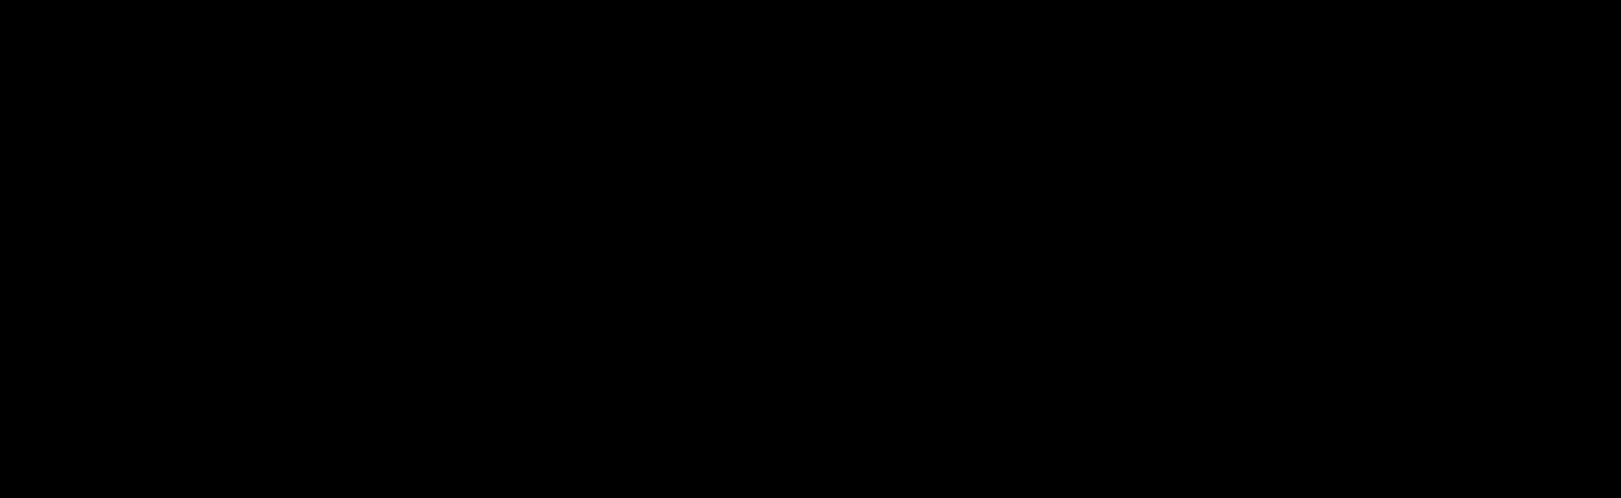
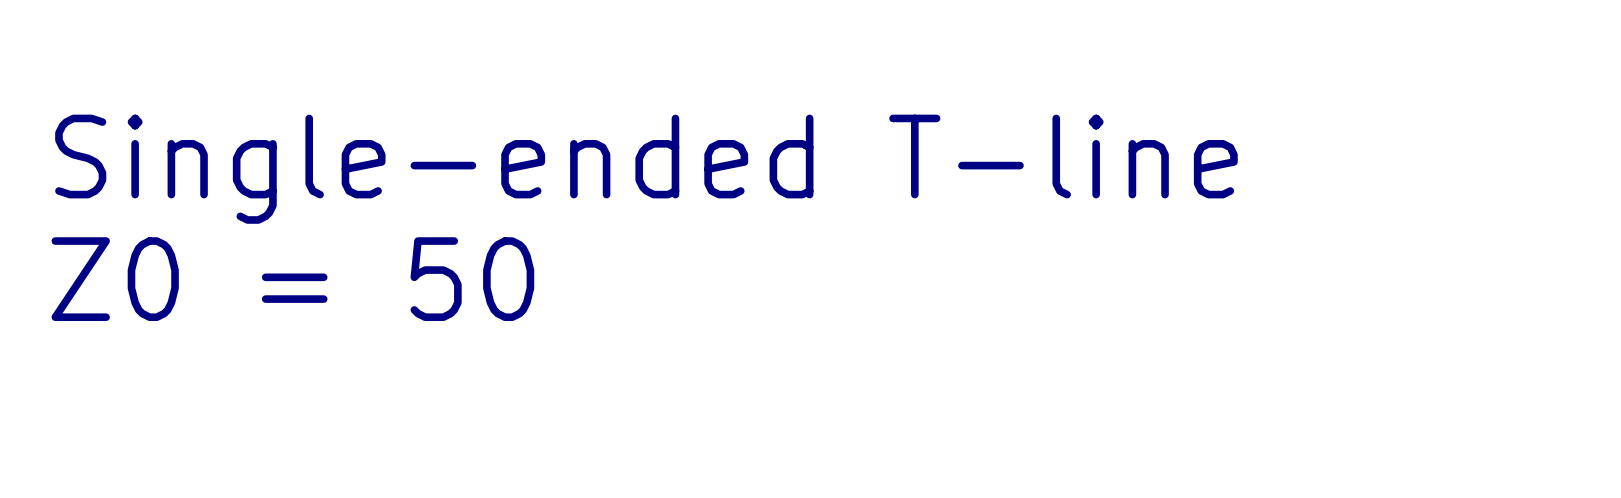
text: none -> Single-ended T-line (646, 169)
text: none -> Z0 = 50 (292, 279)

